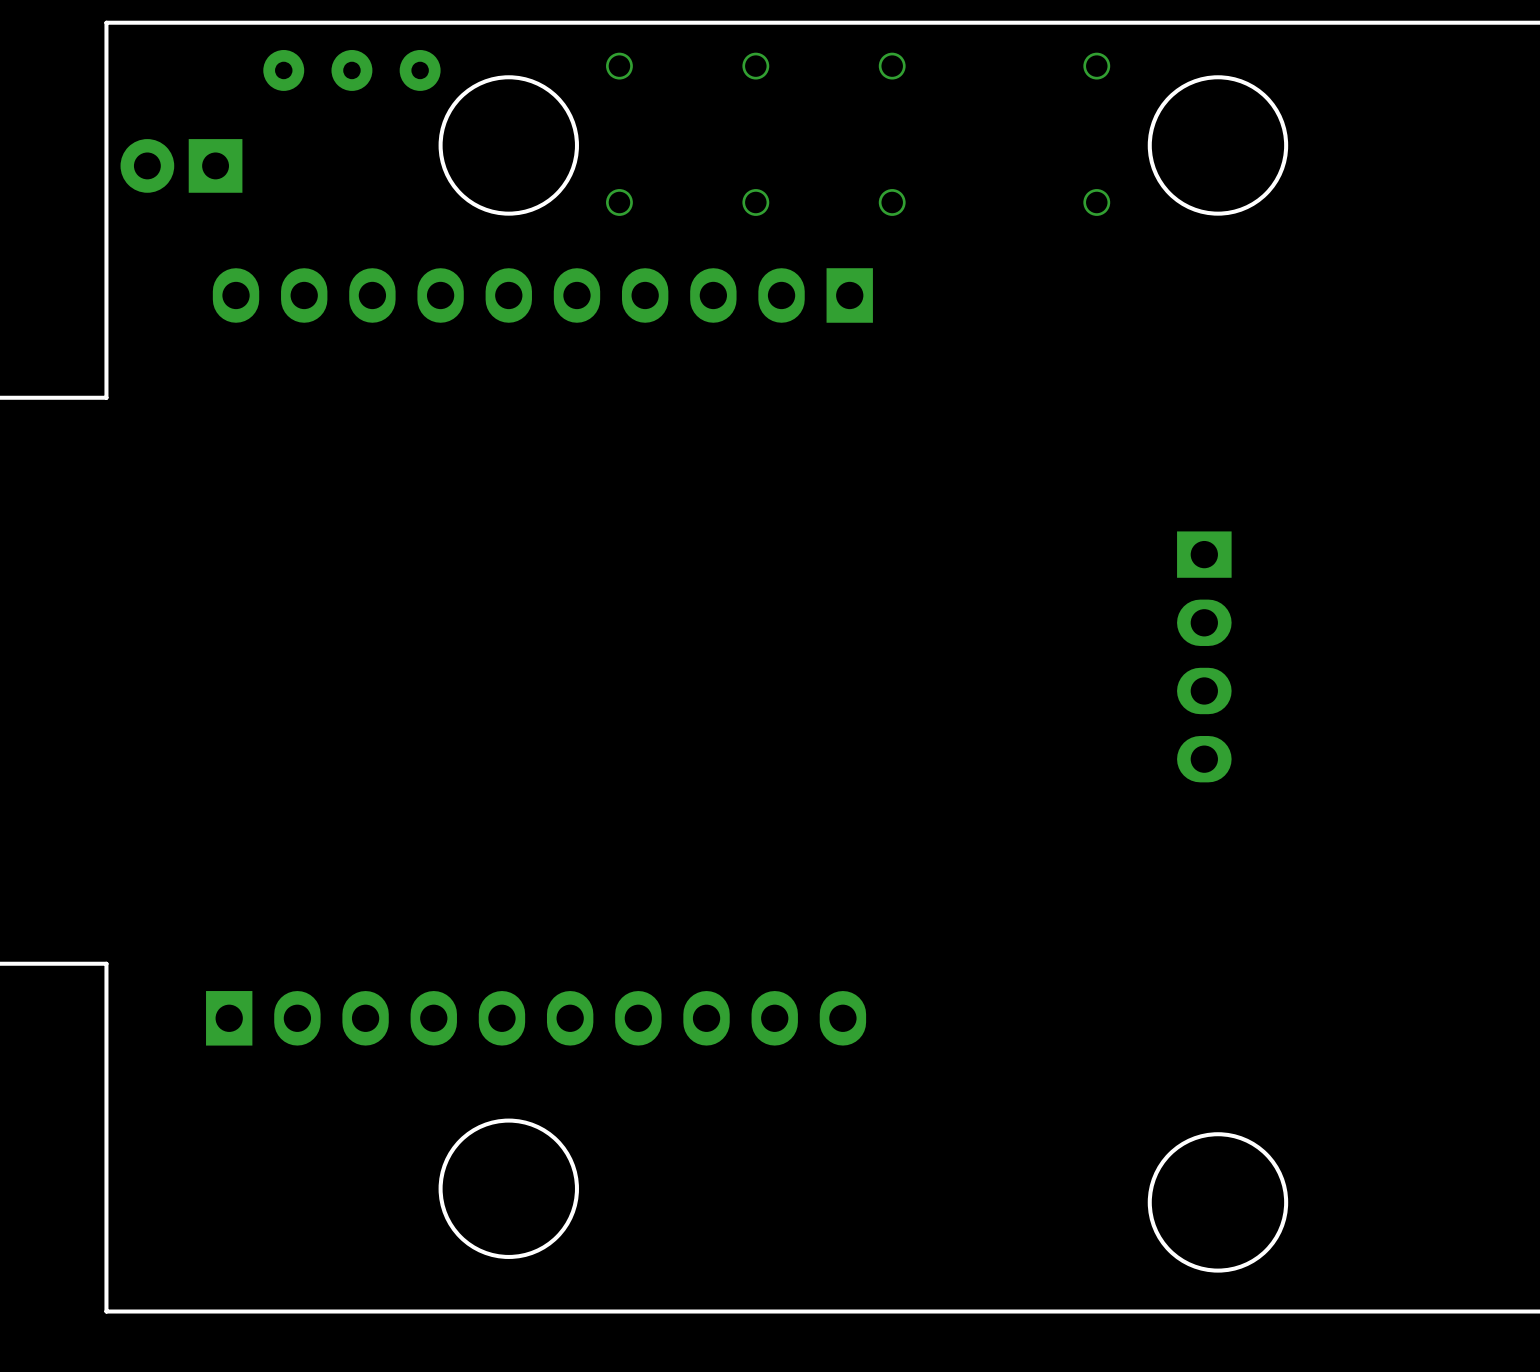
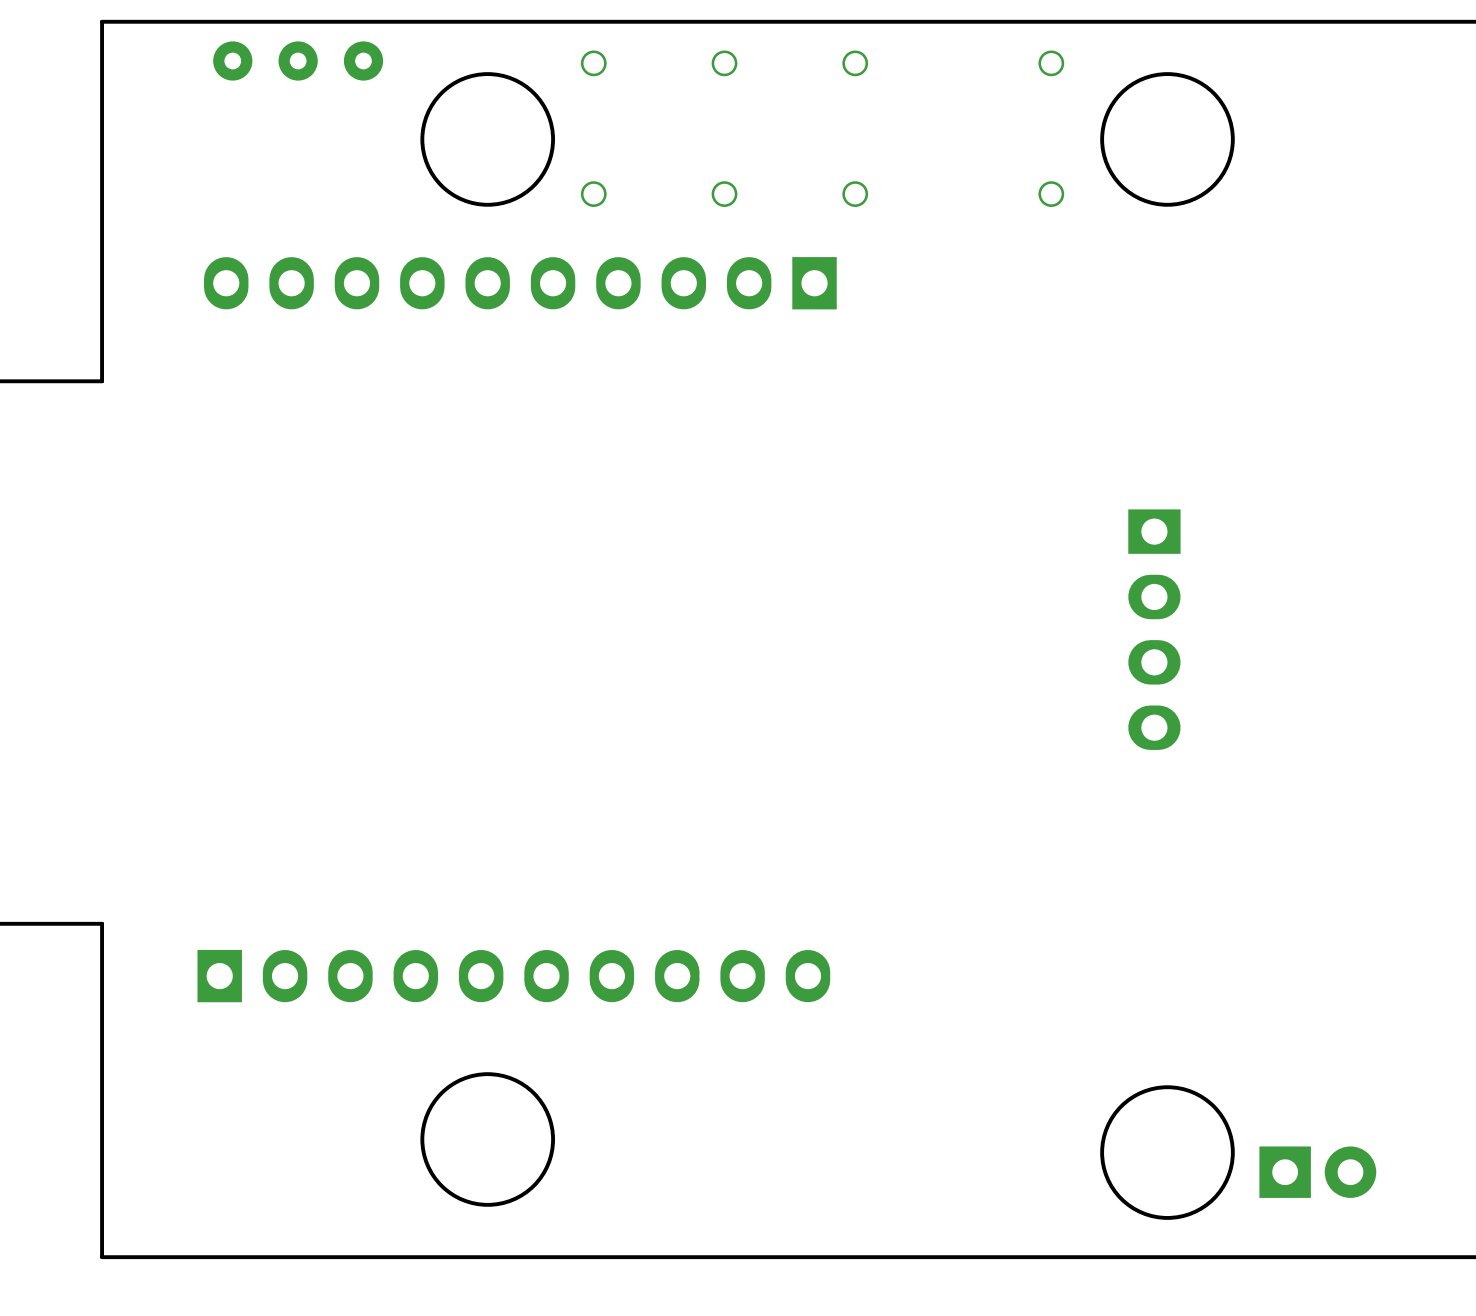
part position: (351, 70) -> (298, 61)
part: (181, 165) -> none
part: none -> (1317, 1172)

